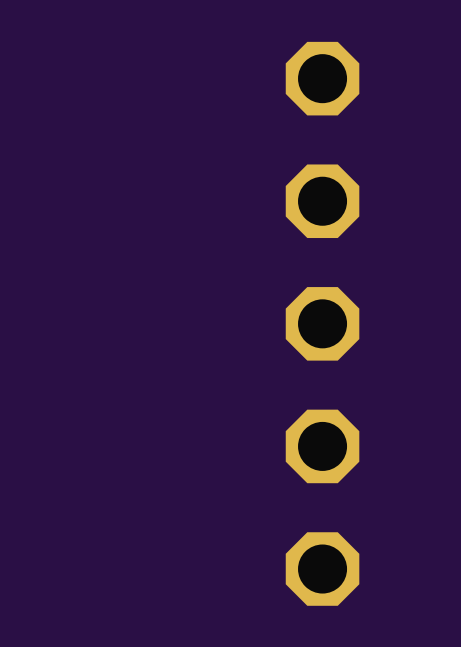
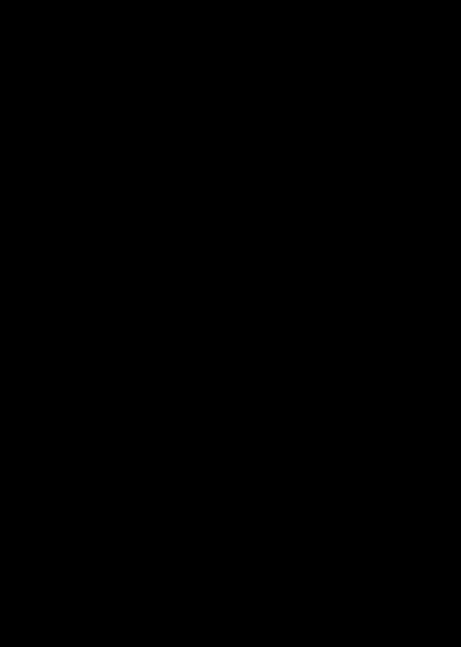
part: (322, 78) -> none
part: (322, 201) -> none
part: (322, 323) -> none
part: (322, 446) -> none
part: (322, 569) -> none

